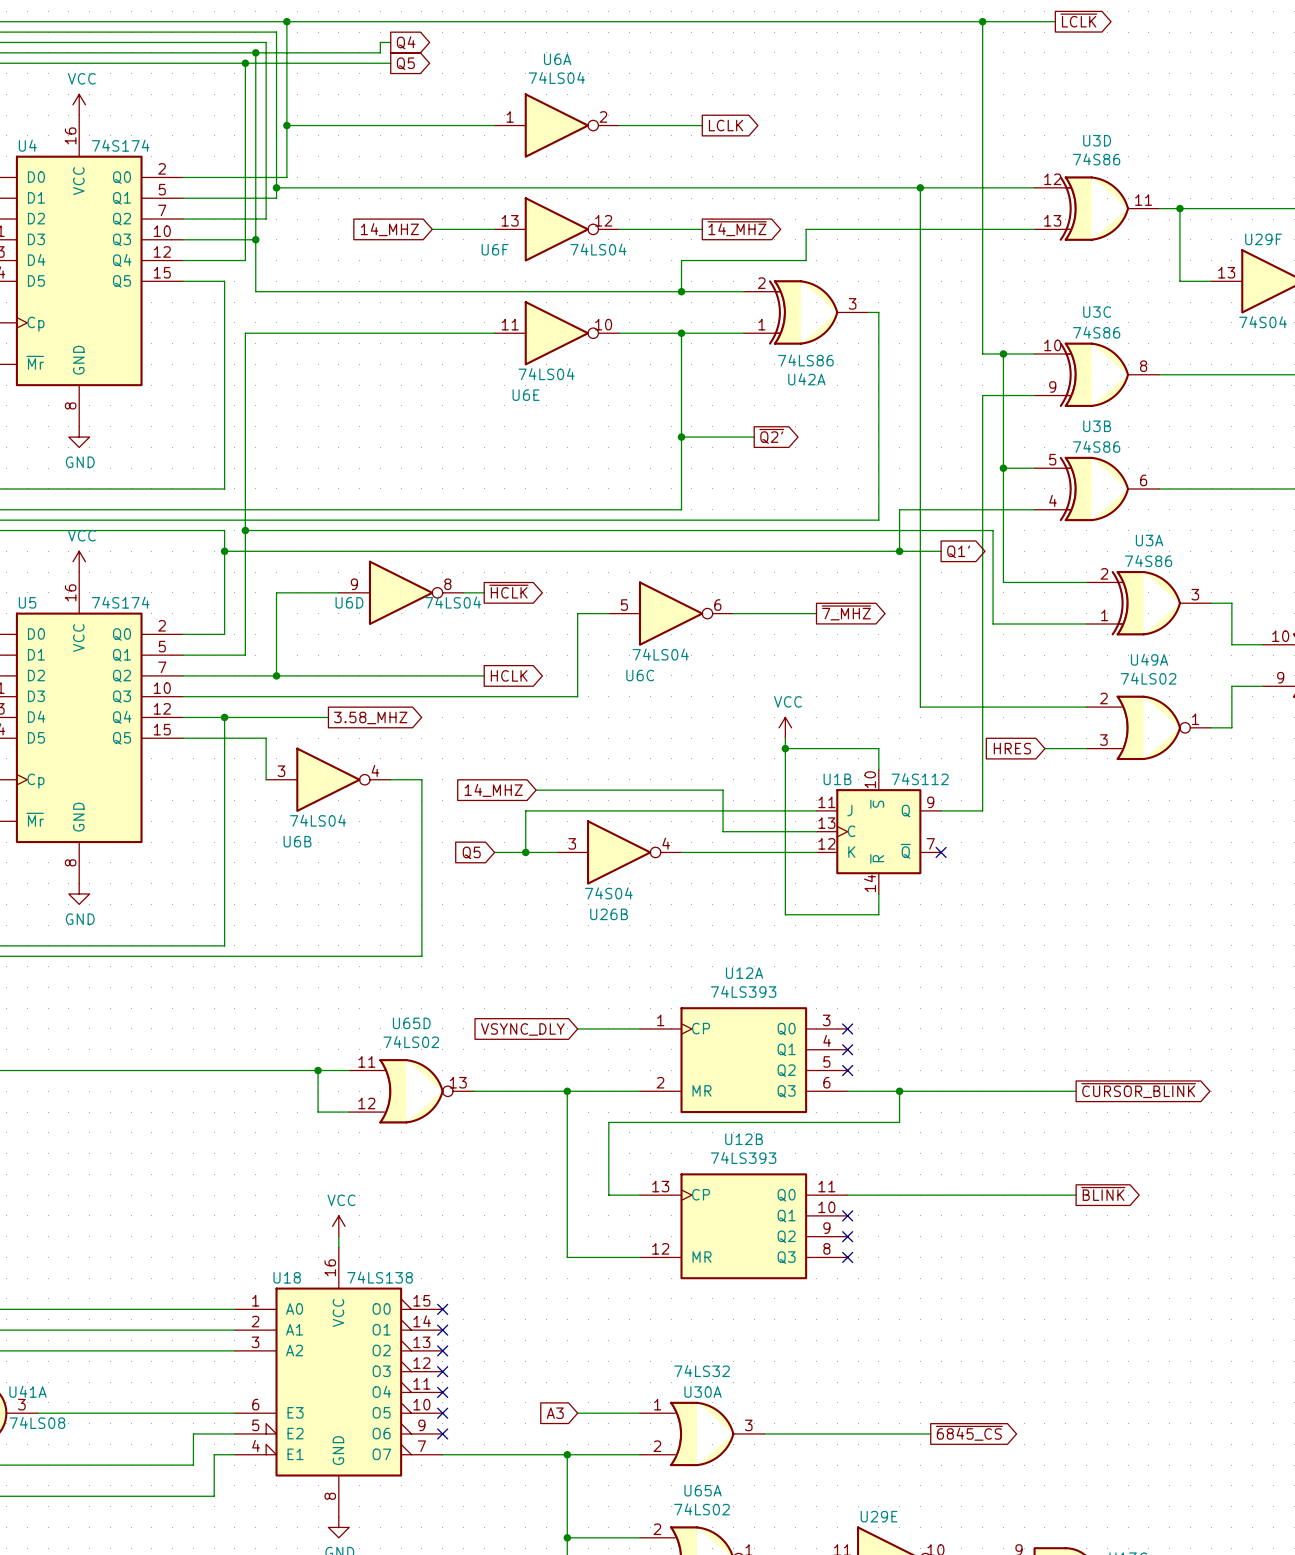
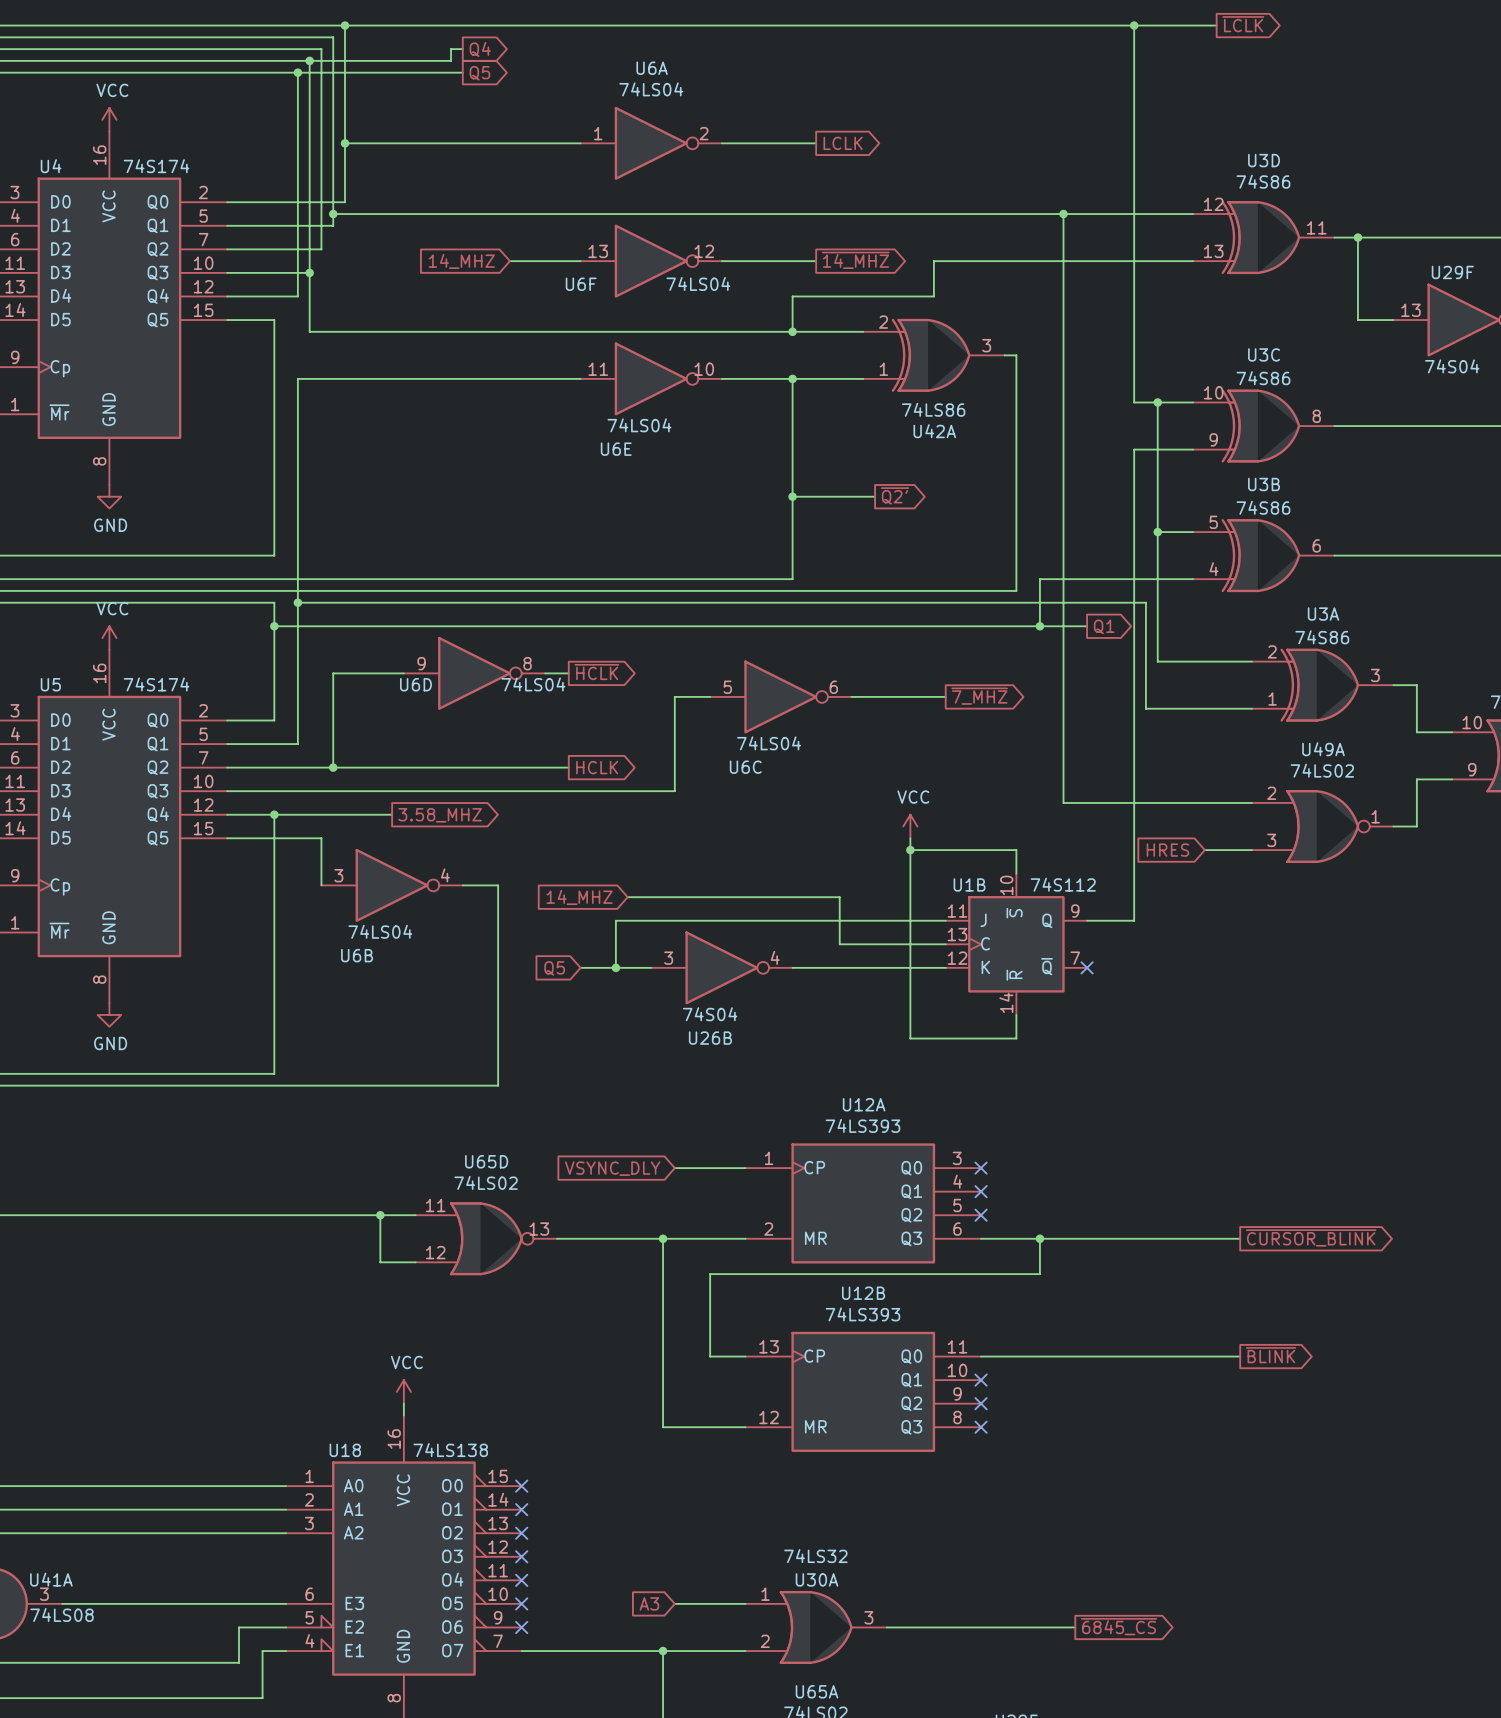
global label: Q1' (958, 551) -> Q1 (1104, 626)

